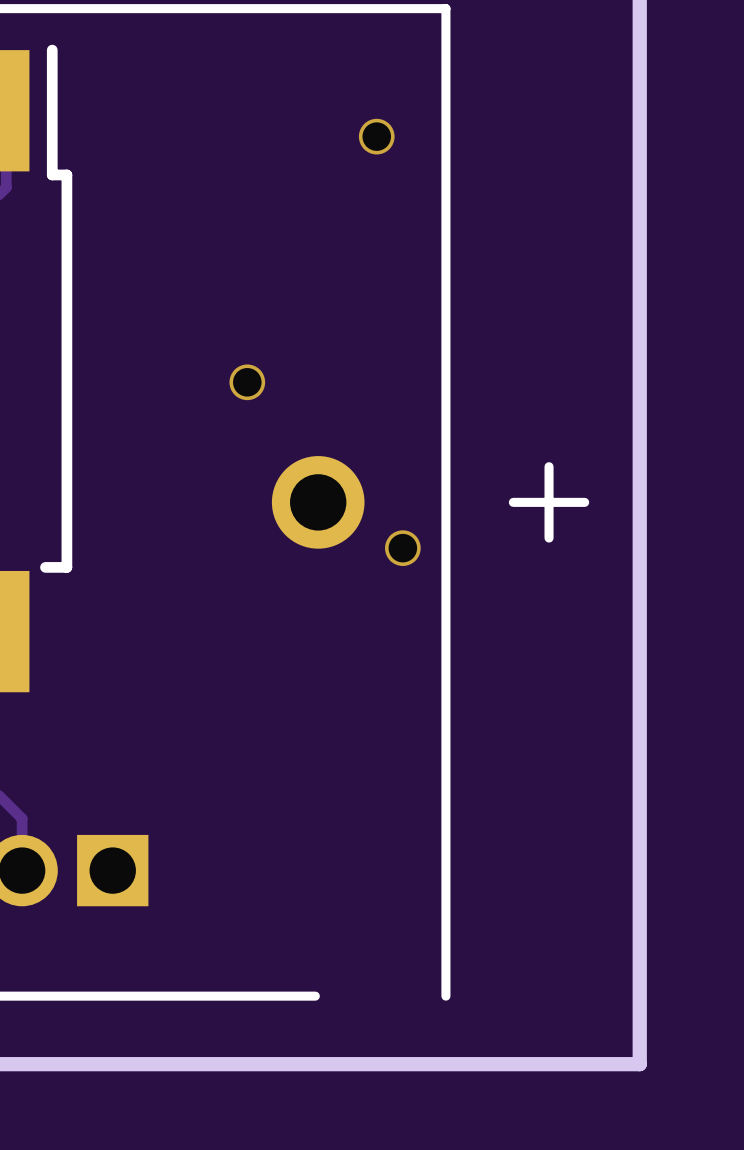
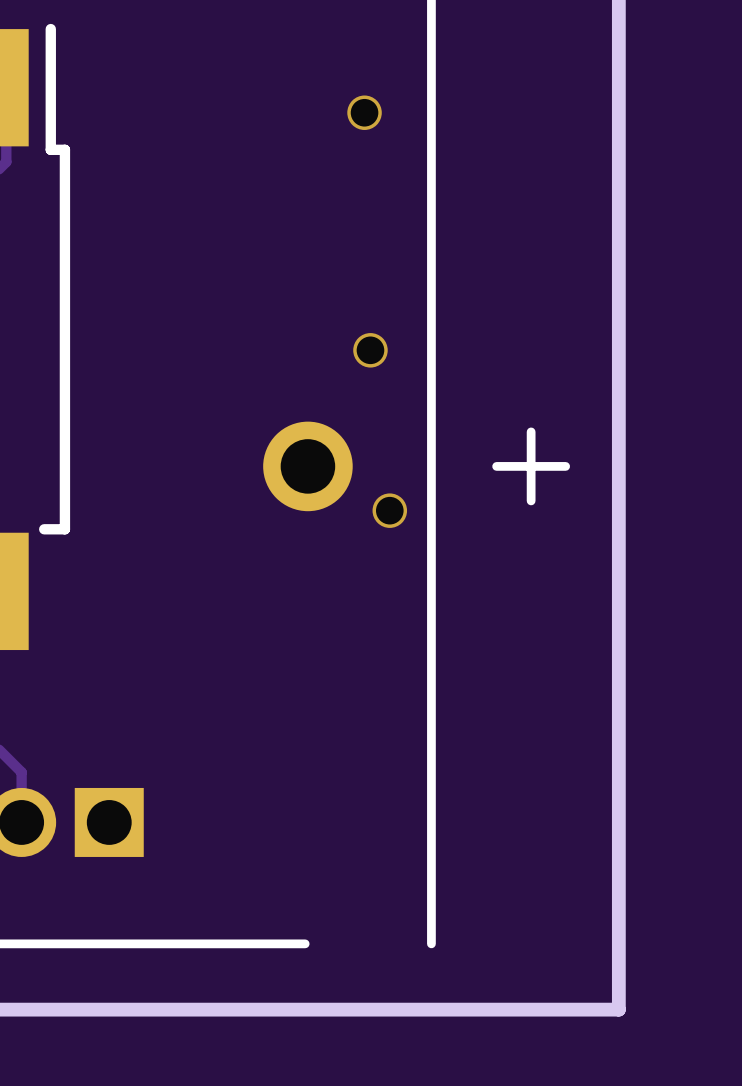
via position: (247, 382) -> (370, 350)

